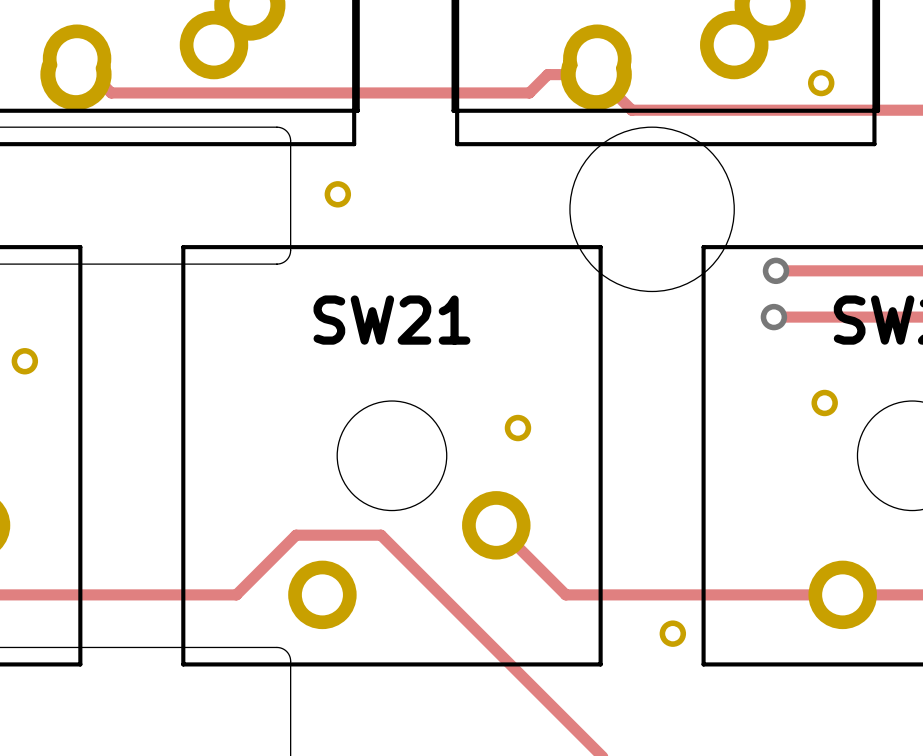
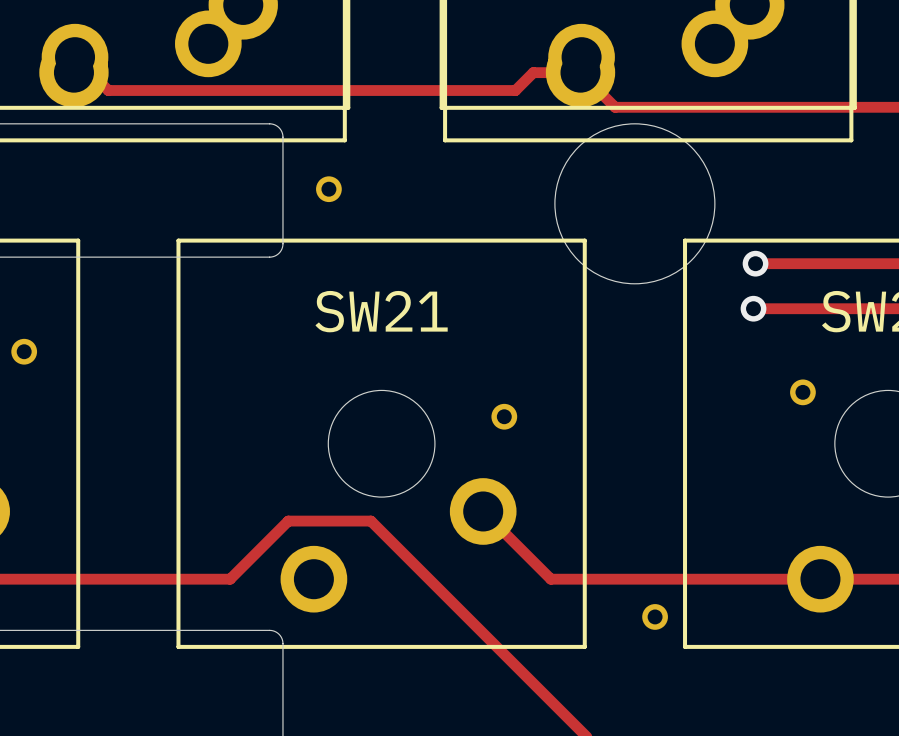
part: (821, 83) -> none

